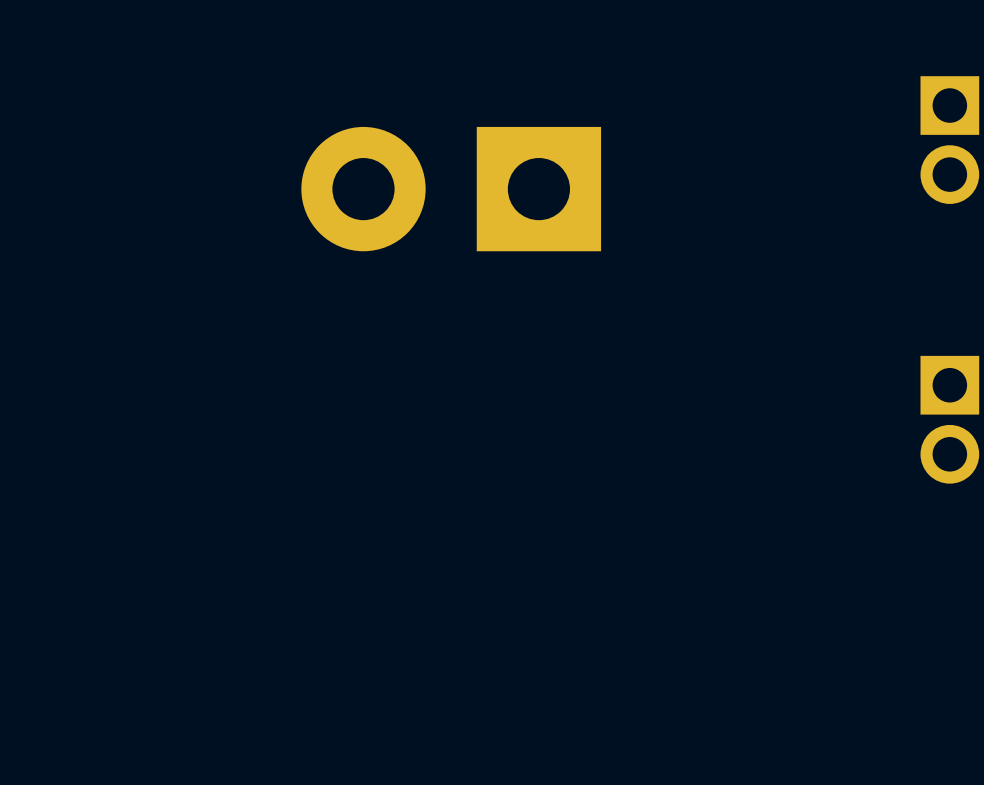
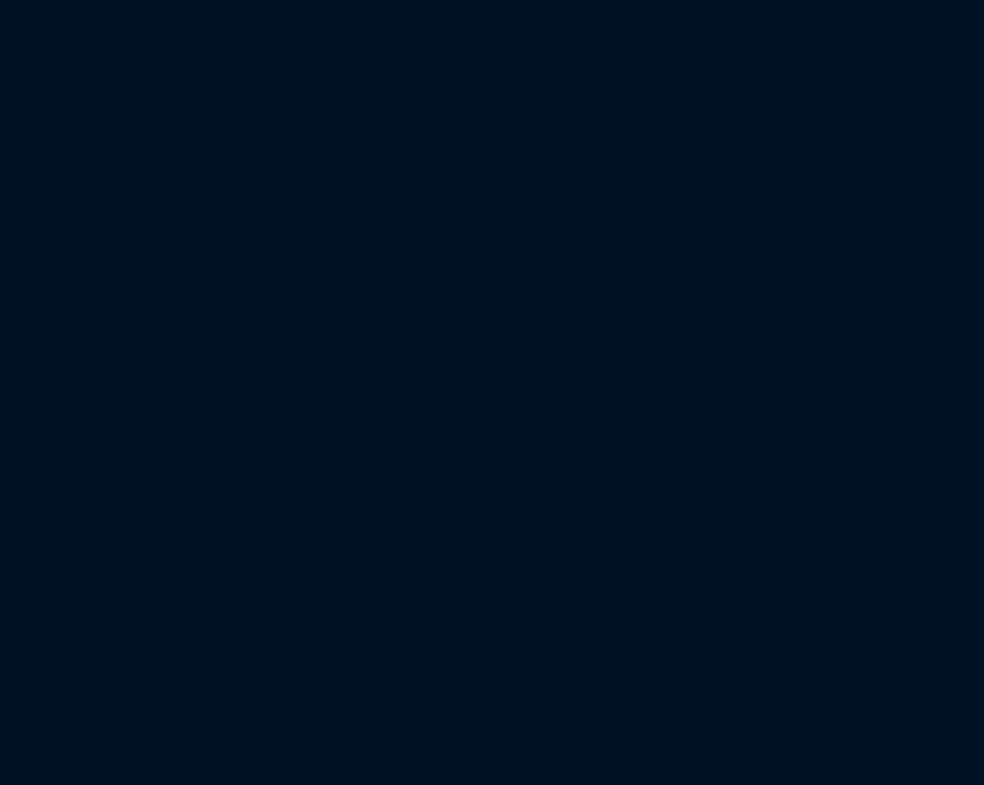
part: (949, 140) -> none
part: (451, 189) -> none
part: (949, 419) -> none

